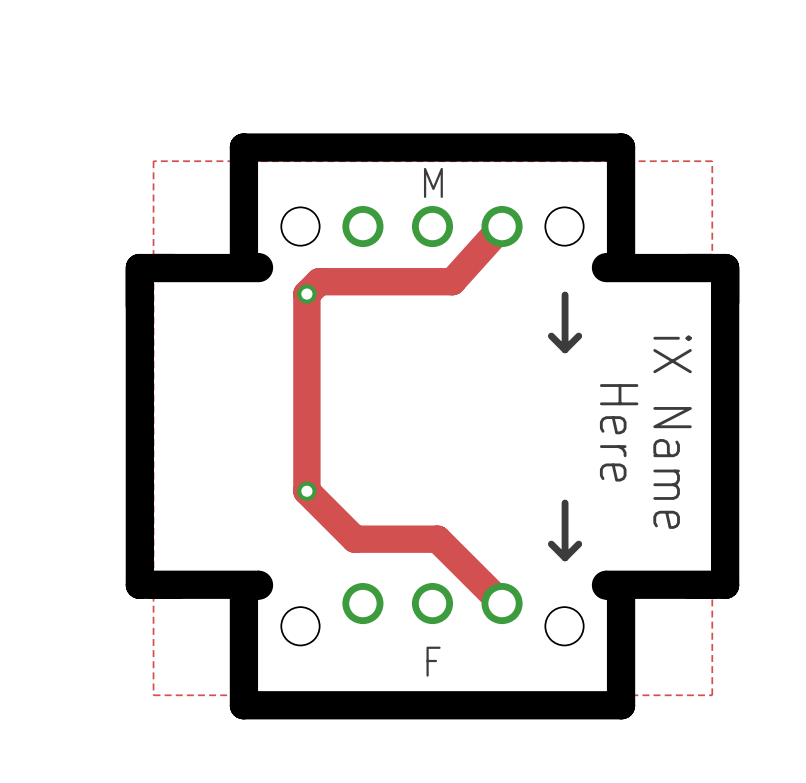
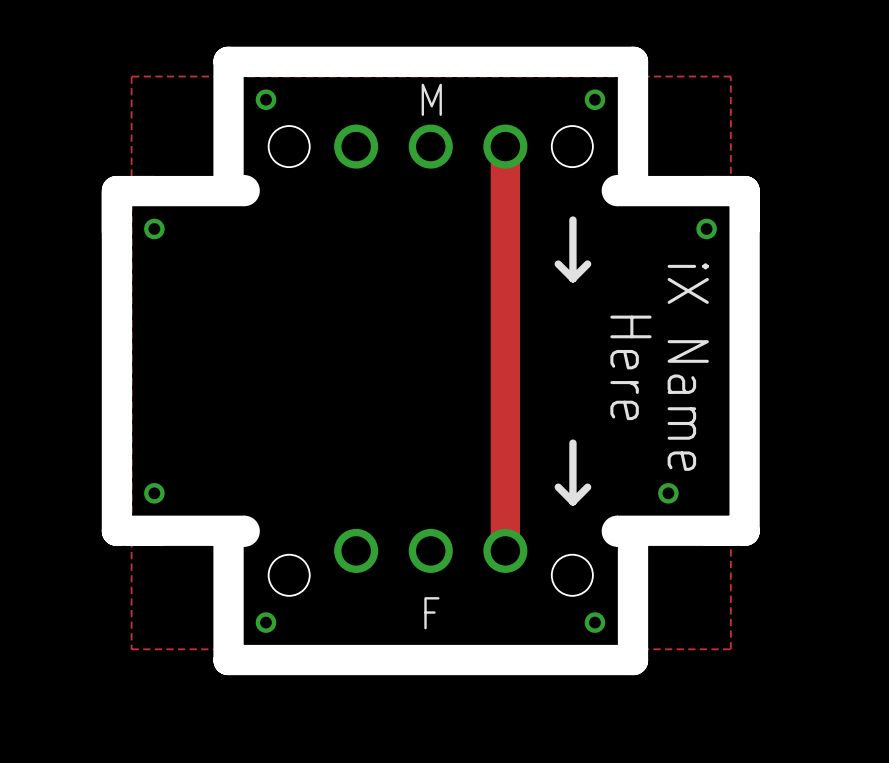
via: none -> (265, 99)
via: none -> (594, 99)
track: (502, 226) (452, 281) (319, 281) (306, 294) (306, 491) (354, 539) (437, 539) (502, 603) -> (505, 146) (505, 550)
via: (306, 294) -> none
via: none -> (154, 228)
via: none -> (706, 228)
via: (306, 491) -> none
via: none -> (154, 493)
via: none -> (668, 493)
via: none -> (265, 622)
via: none -> (594, 622)

